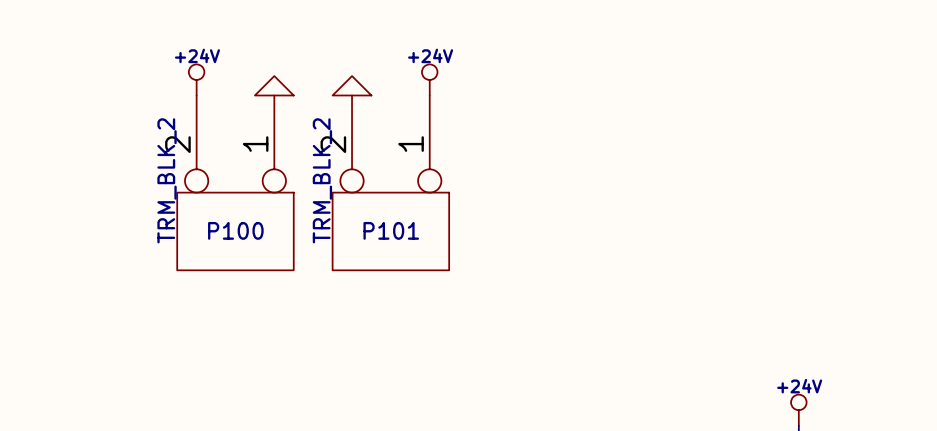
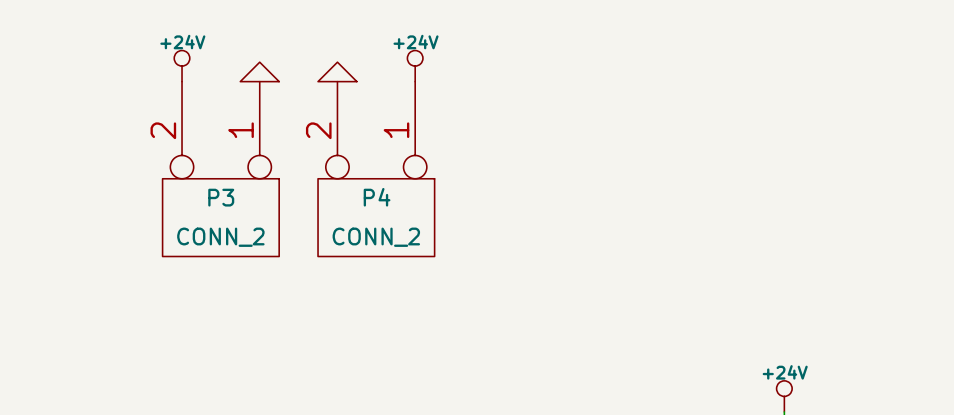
P100 text: TRM_BLK_2 (167, 180) -> none
P101 text: TRM_BLK_2 (322, 180) -> none
P100 name: P100 (235, 230) -> P3 (221, 197)
P101 name: P101 (391, 230) -> P4 (377, 197)
P100 value: none -> CONN_2 (220, 237)
P101 value: none -> CONN_2 (376, 237)

